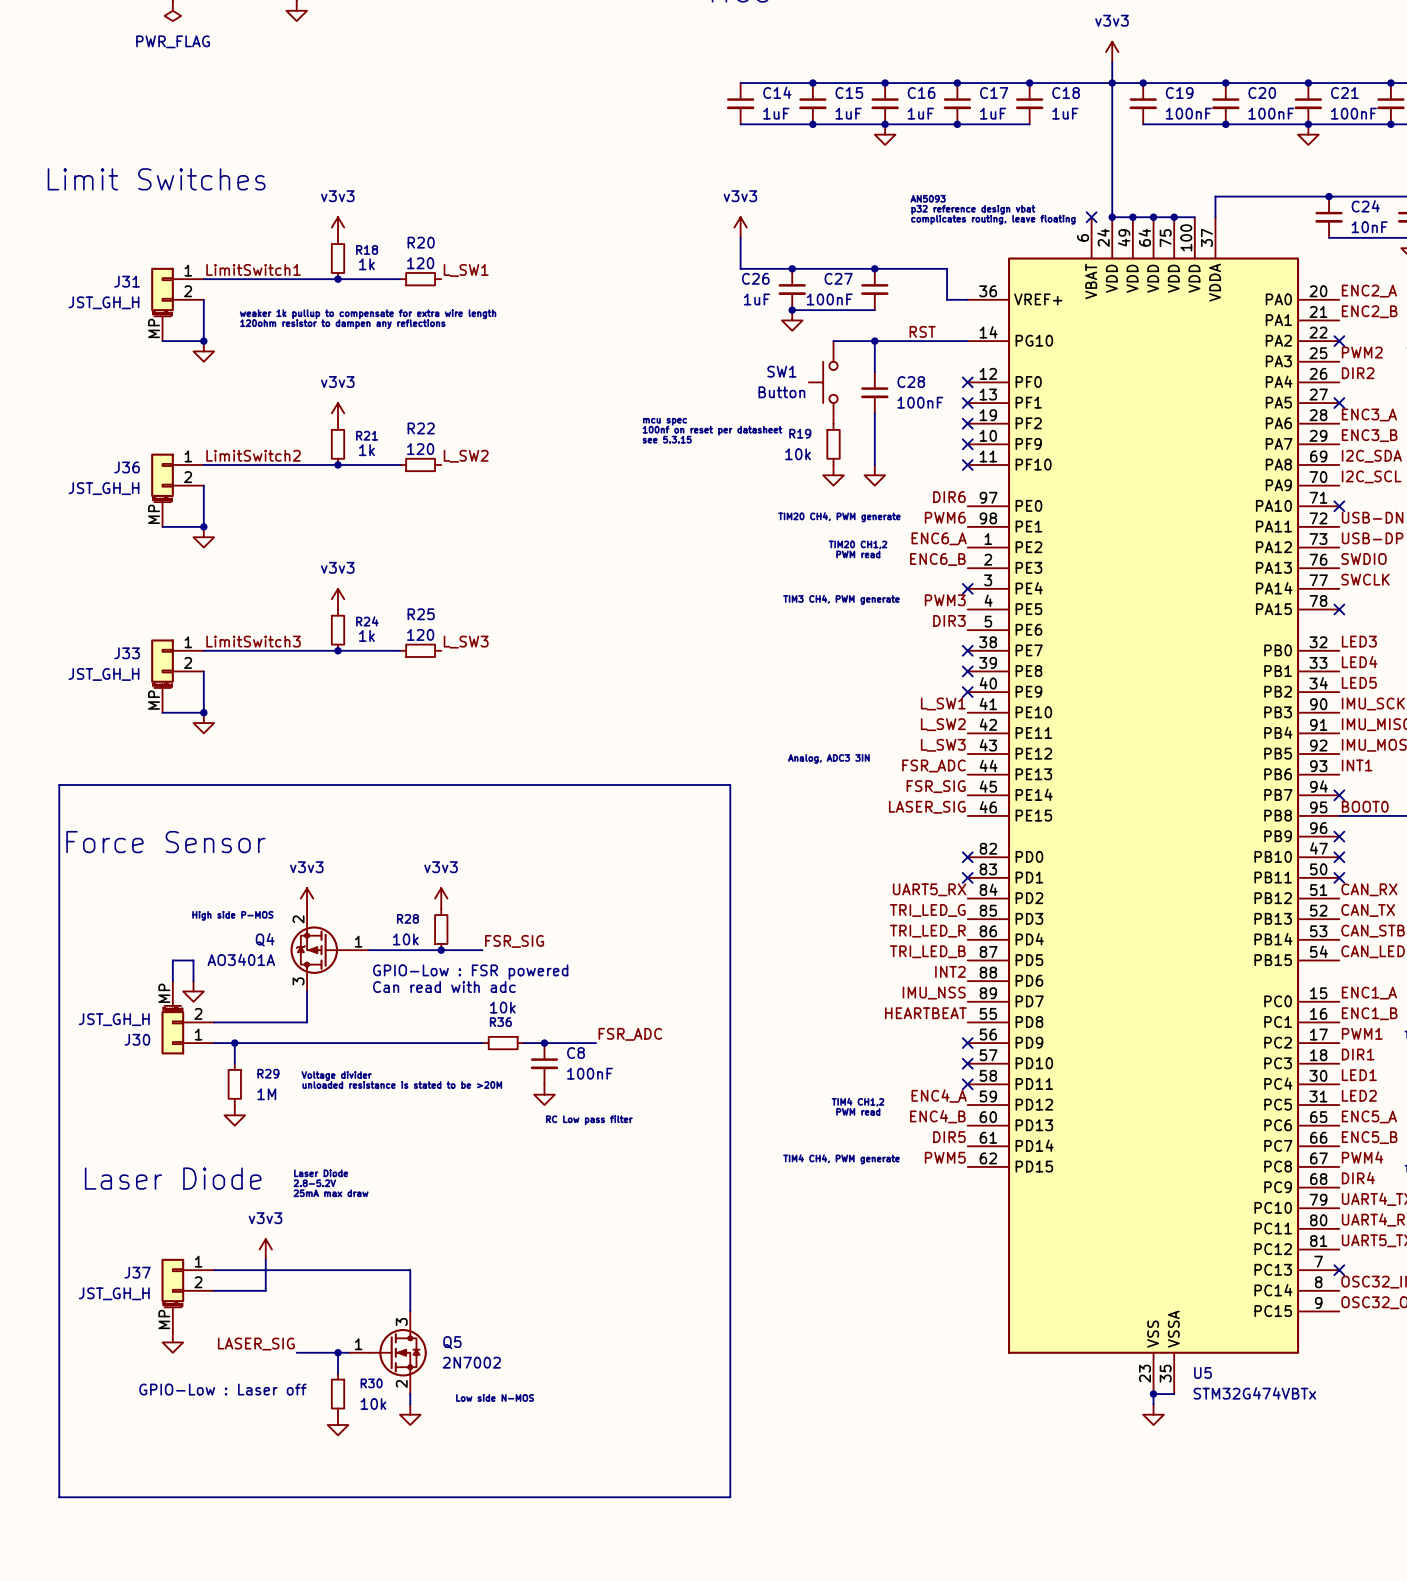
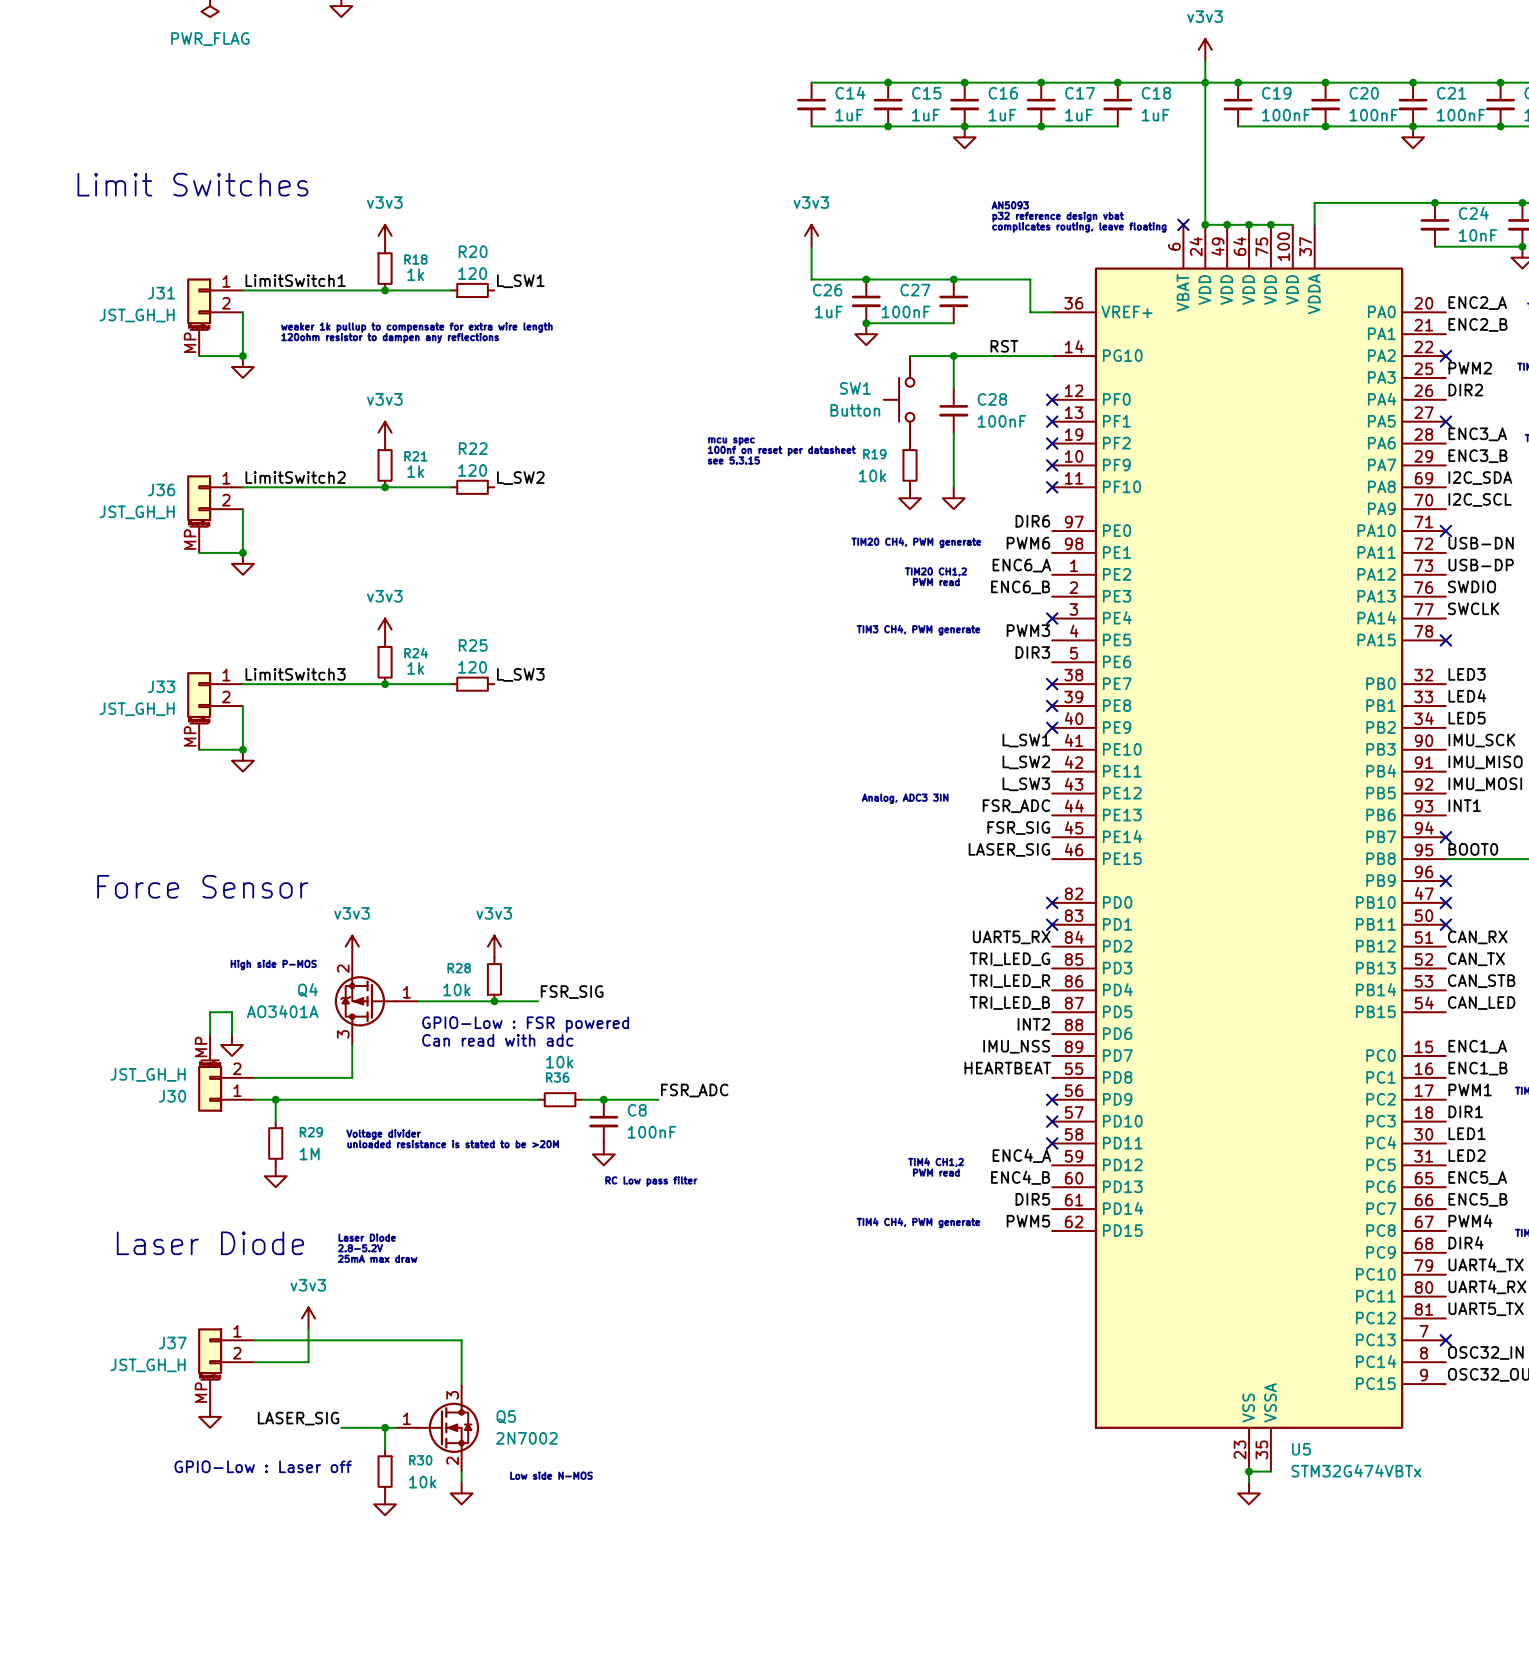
line: (59, 784) (730, 784) (730, 1497) (59, 1497) (59, 784) -> none

